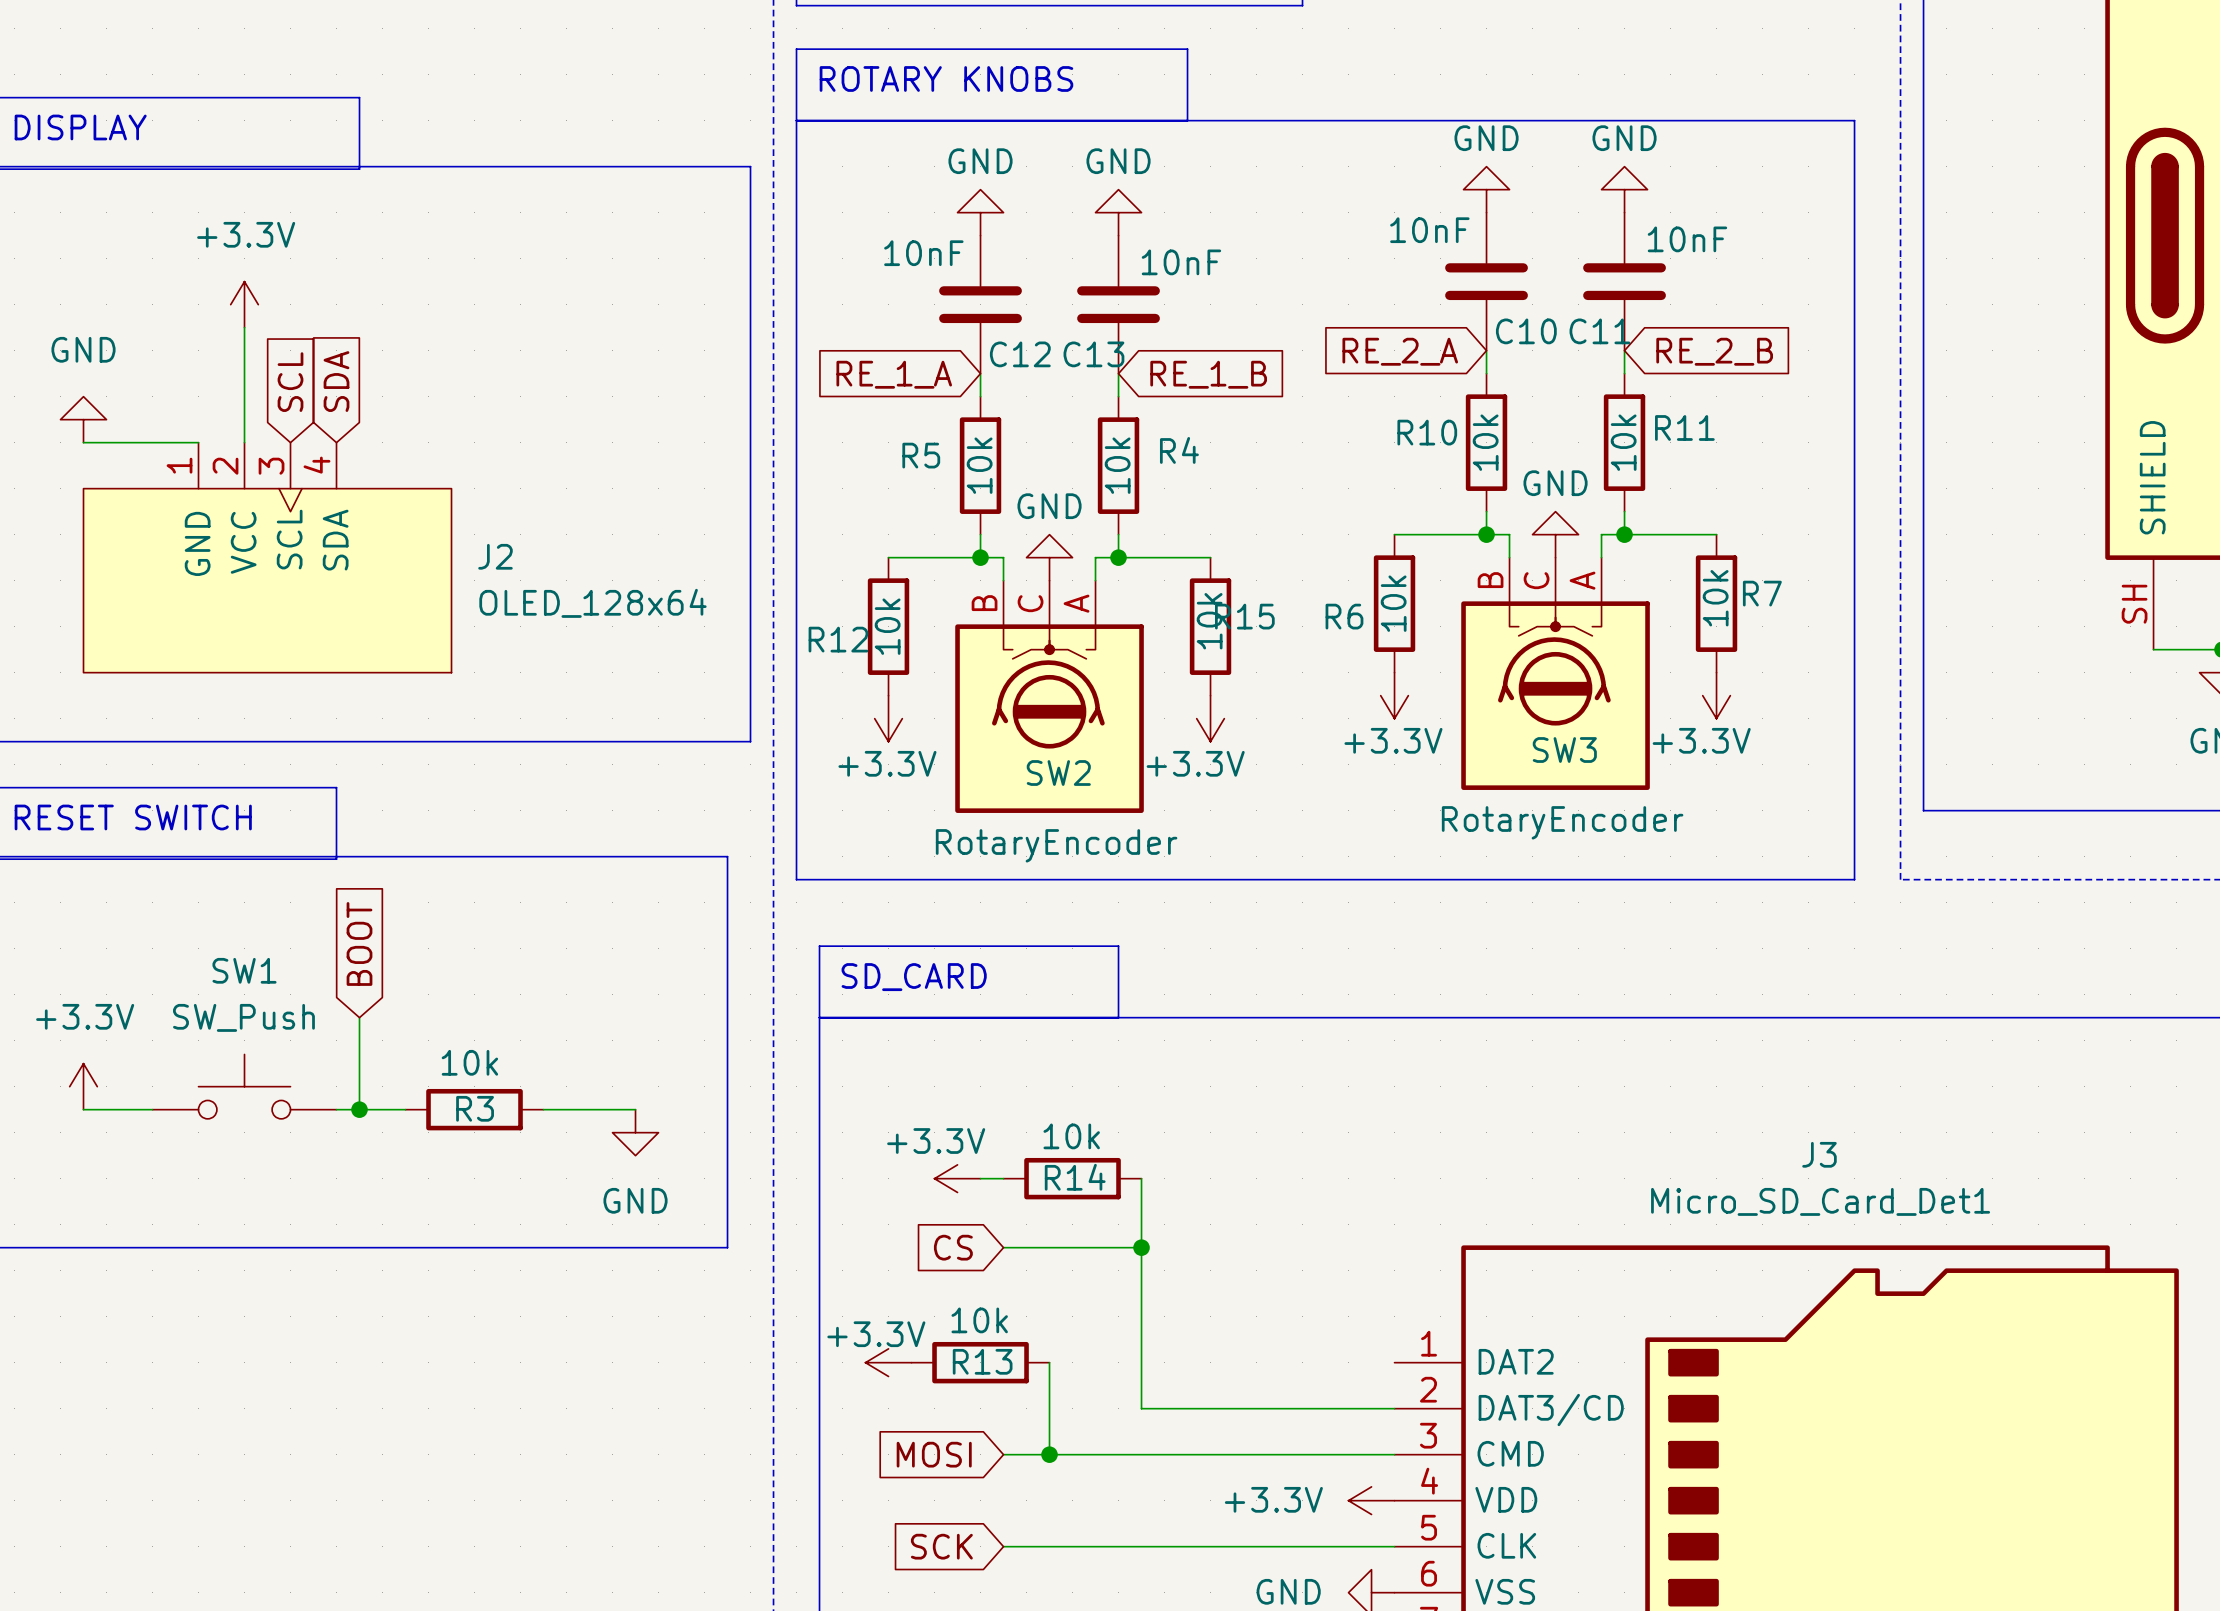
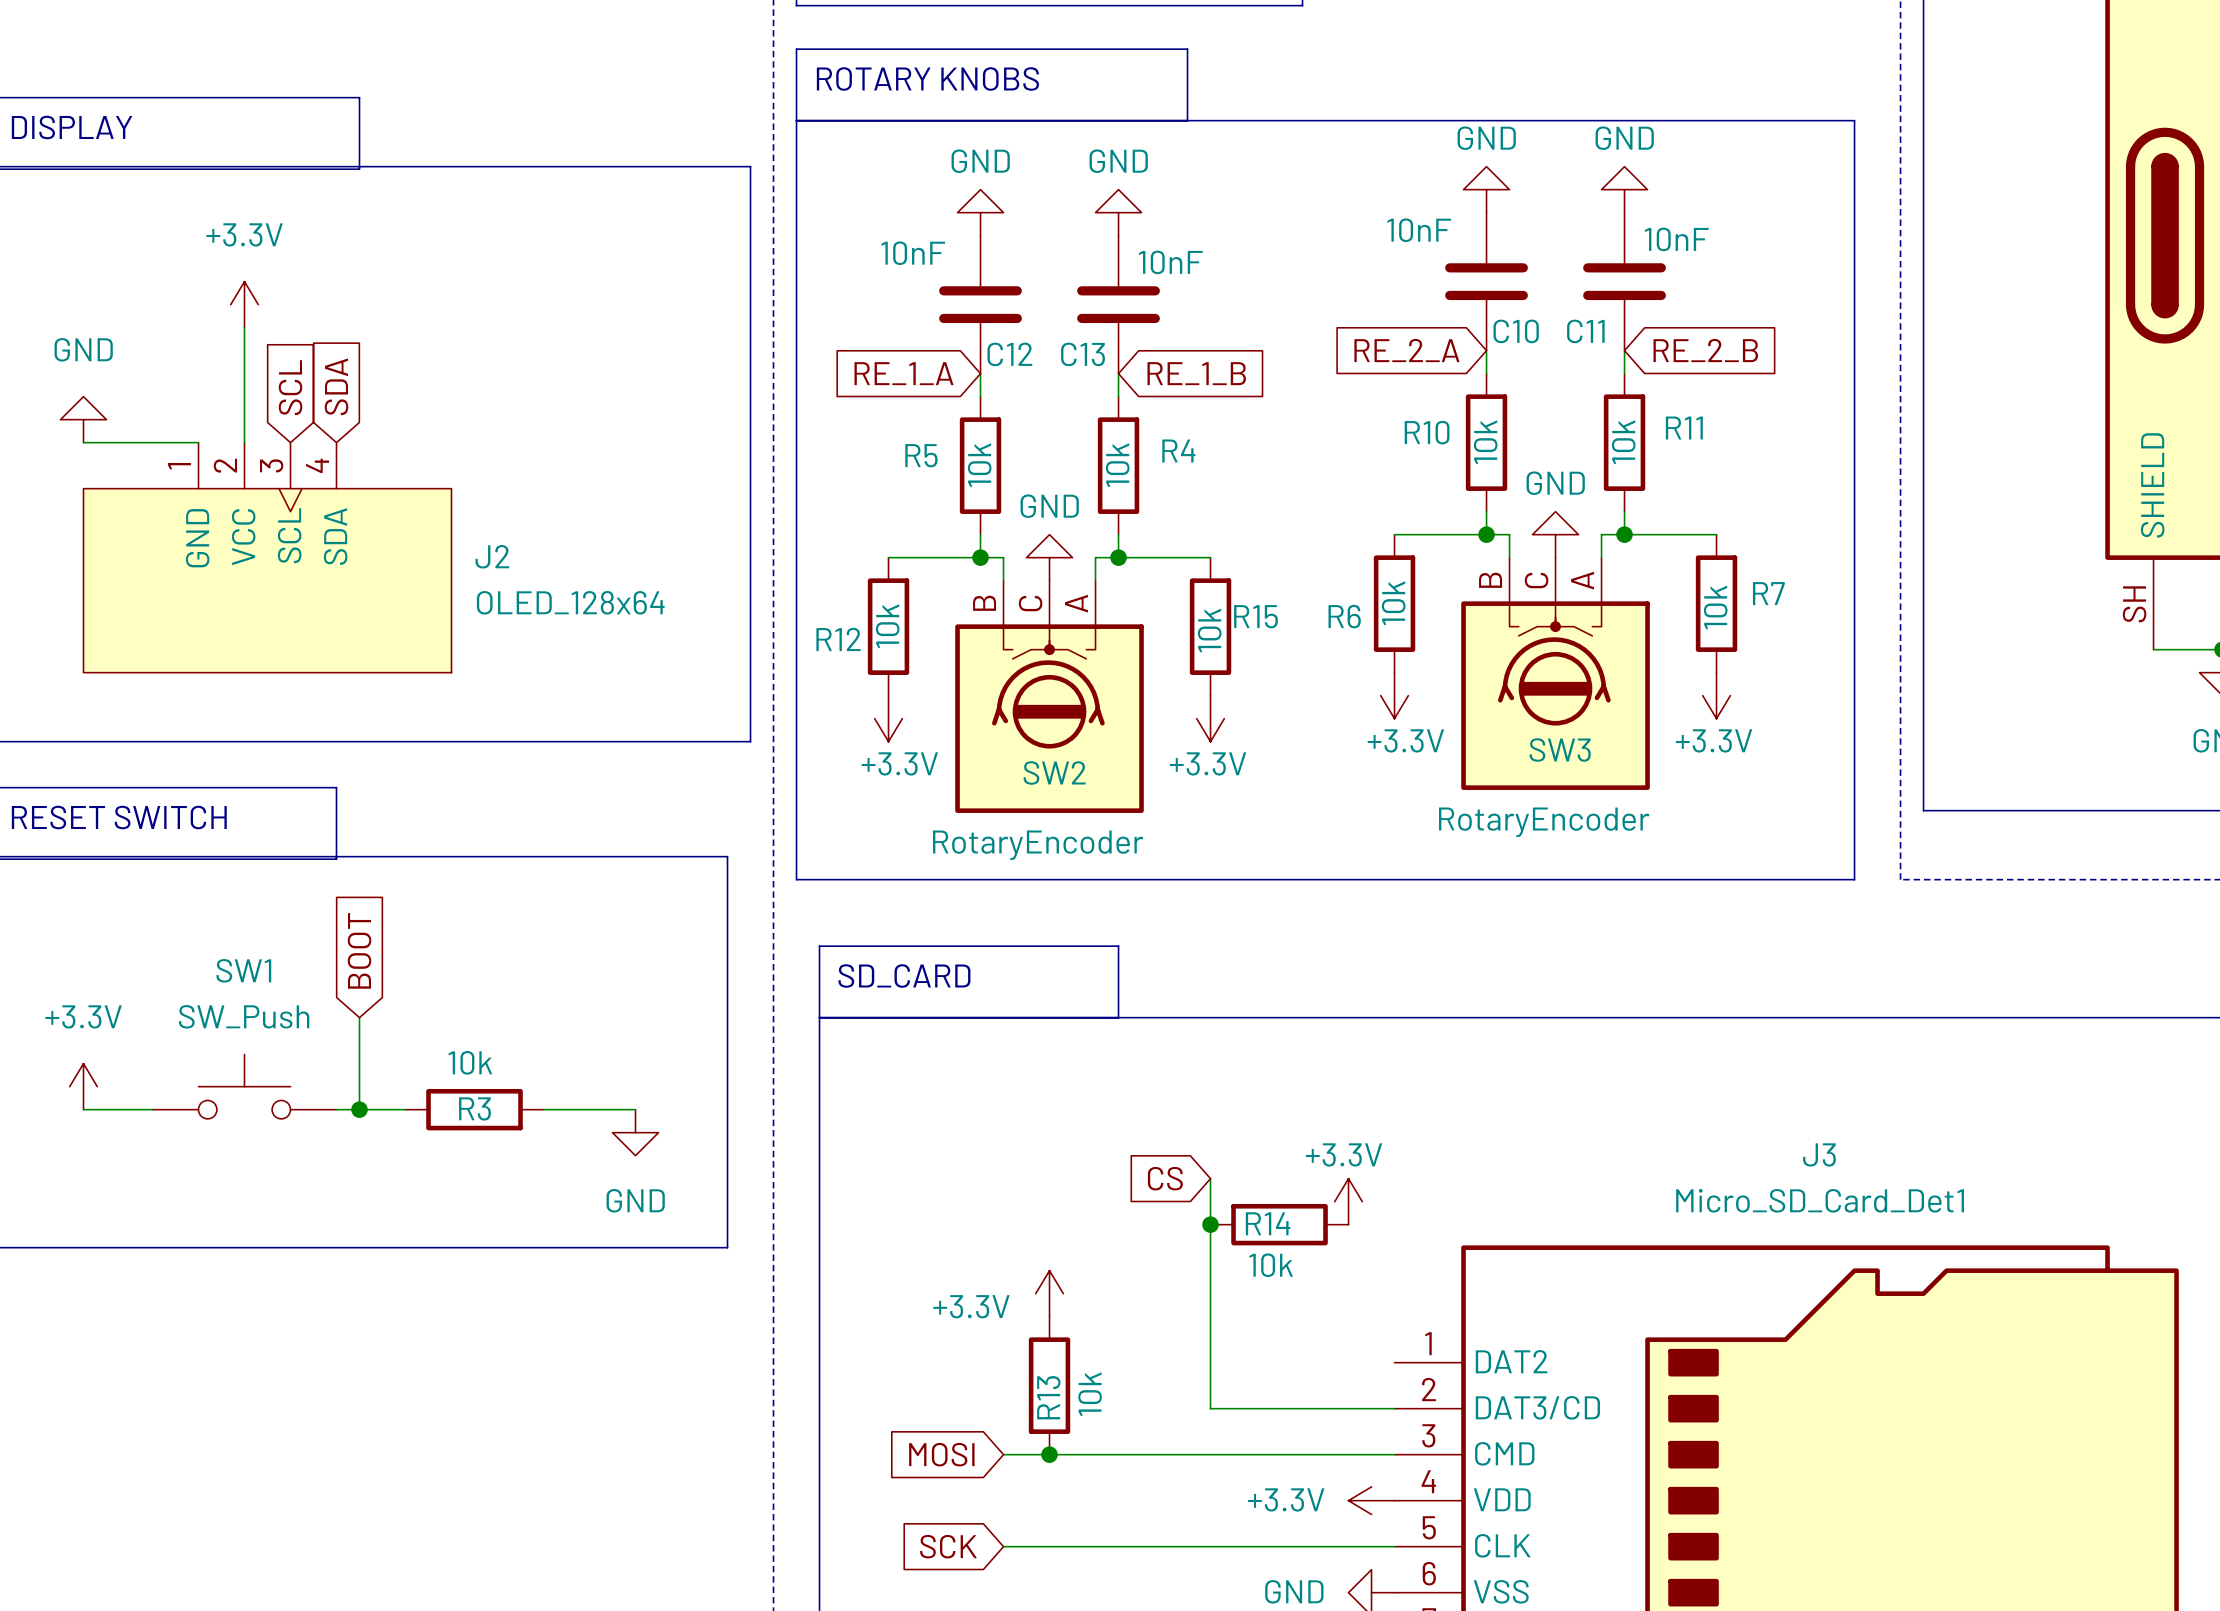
R14 value position: 10k (1071, 1136) -> 10k (1271, 1265)
R14 name position: R14 (1075, 1177) -> R14 (1268, 1223)
power symbol: +3.3V (957, 1178) -> none
wire: (980, 1178) (1003, 1178) -> none
R14 position: (1072, 1178) -> (1279, 1224)
wire: (1141, 1178) (1141, 1408) (1210, 1408) -> (1210, 1178) (1210, 1408)
power symbol: none -> +3.3V (1348, 1201)
global label position: CS (953, 1247) -> CS (1165, 1178)
wire: (1003, 1247) (1141, 1247) -> none
junction position: (1141, 1247) -> (1210, 1224)
power symbol: none -> +3.3V (1049, 1293)
power symbol: +3.3V (888, 1362) -> none
R13 rotation: 0° (980, 1362) -> 90° clockwise (1049, 1385)
wire: (1049, 1362) (1049, 1454) -> none

